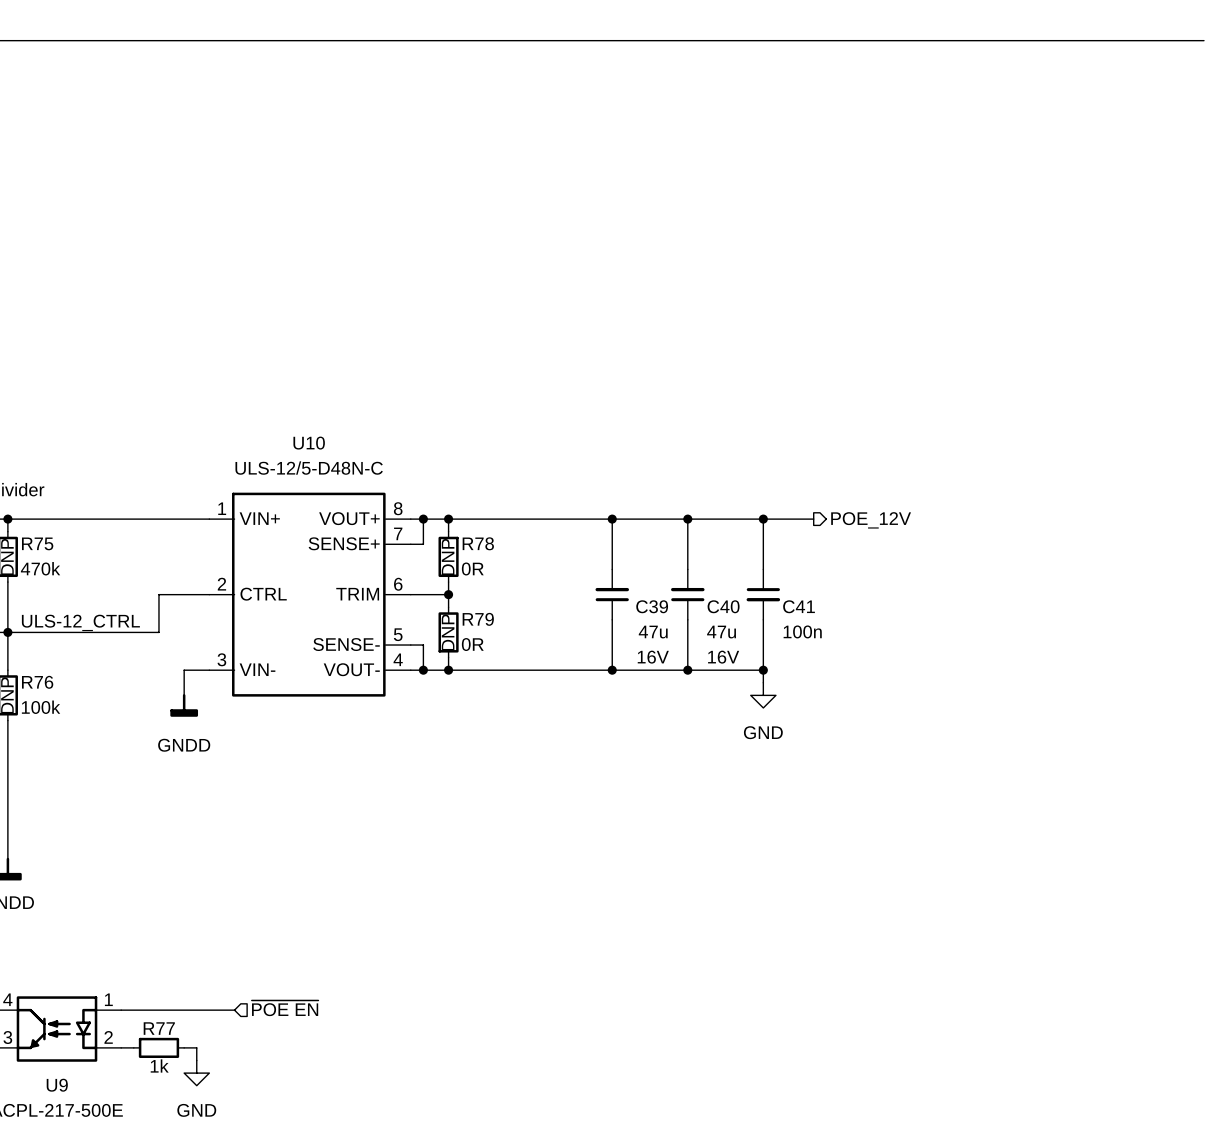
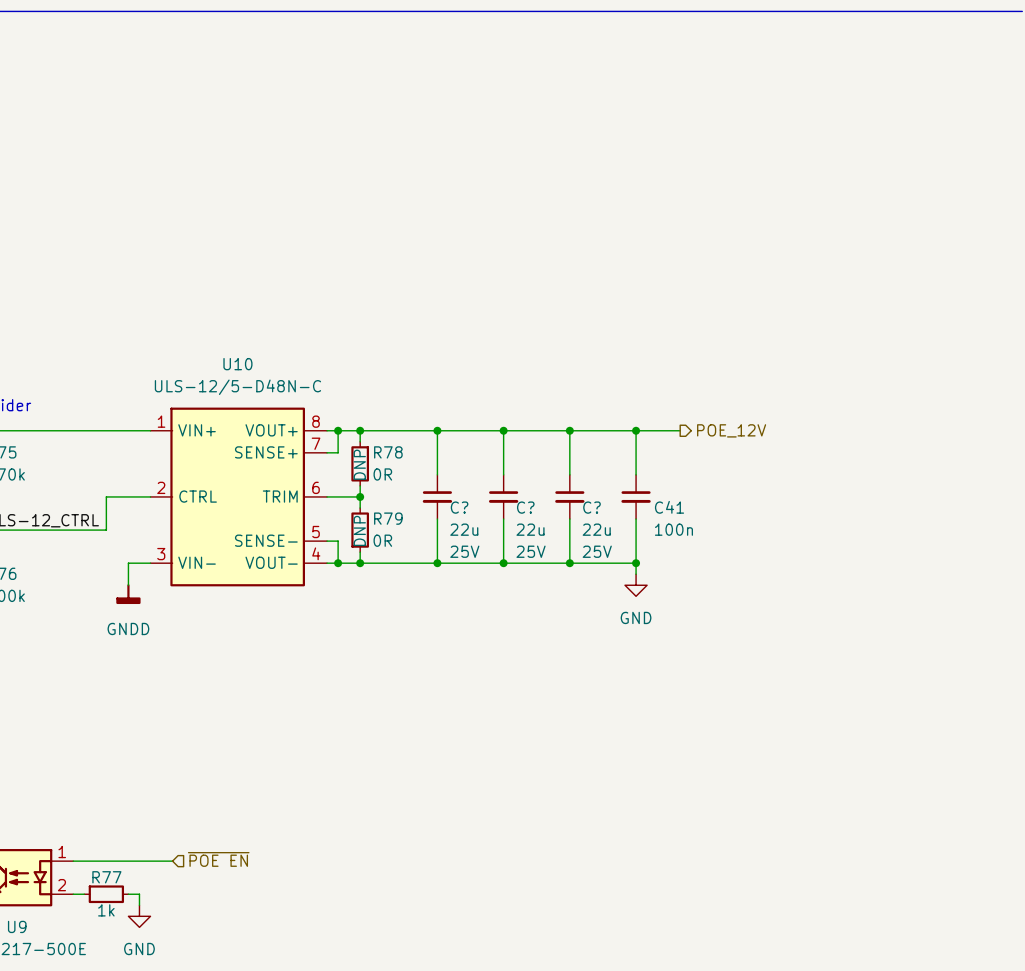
wire: none -> (437, 430) (437, 474)
junction: none -> (437, 430)
C?: none -> (437, 496)
C39: (612, 594) -> none
C?: none -> (503, 496)
C40: (687, 594) -> none
C?: none -> (569, 496)
wire: none -> (437, 519) (437, 563)
junction: none -> (437, 563)

